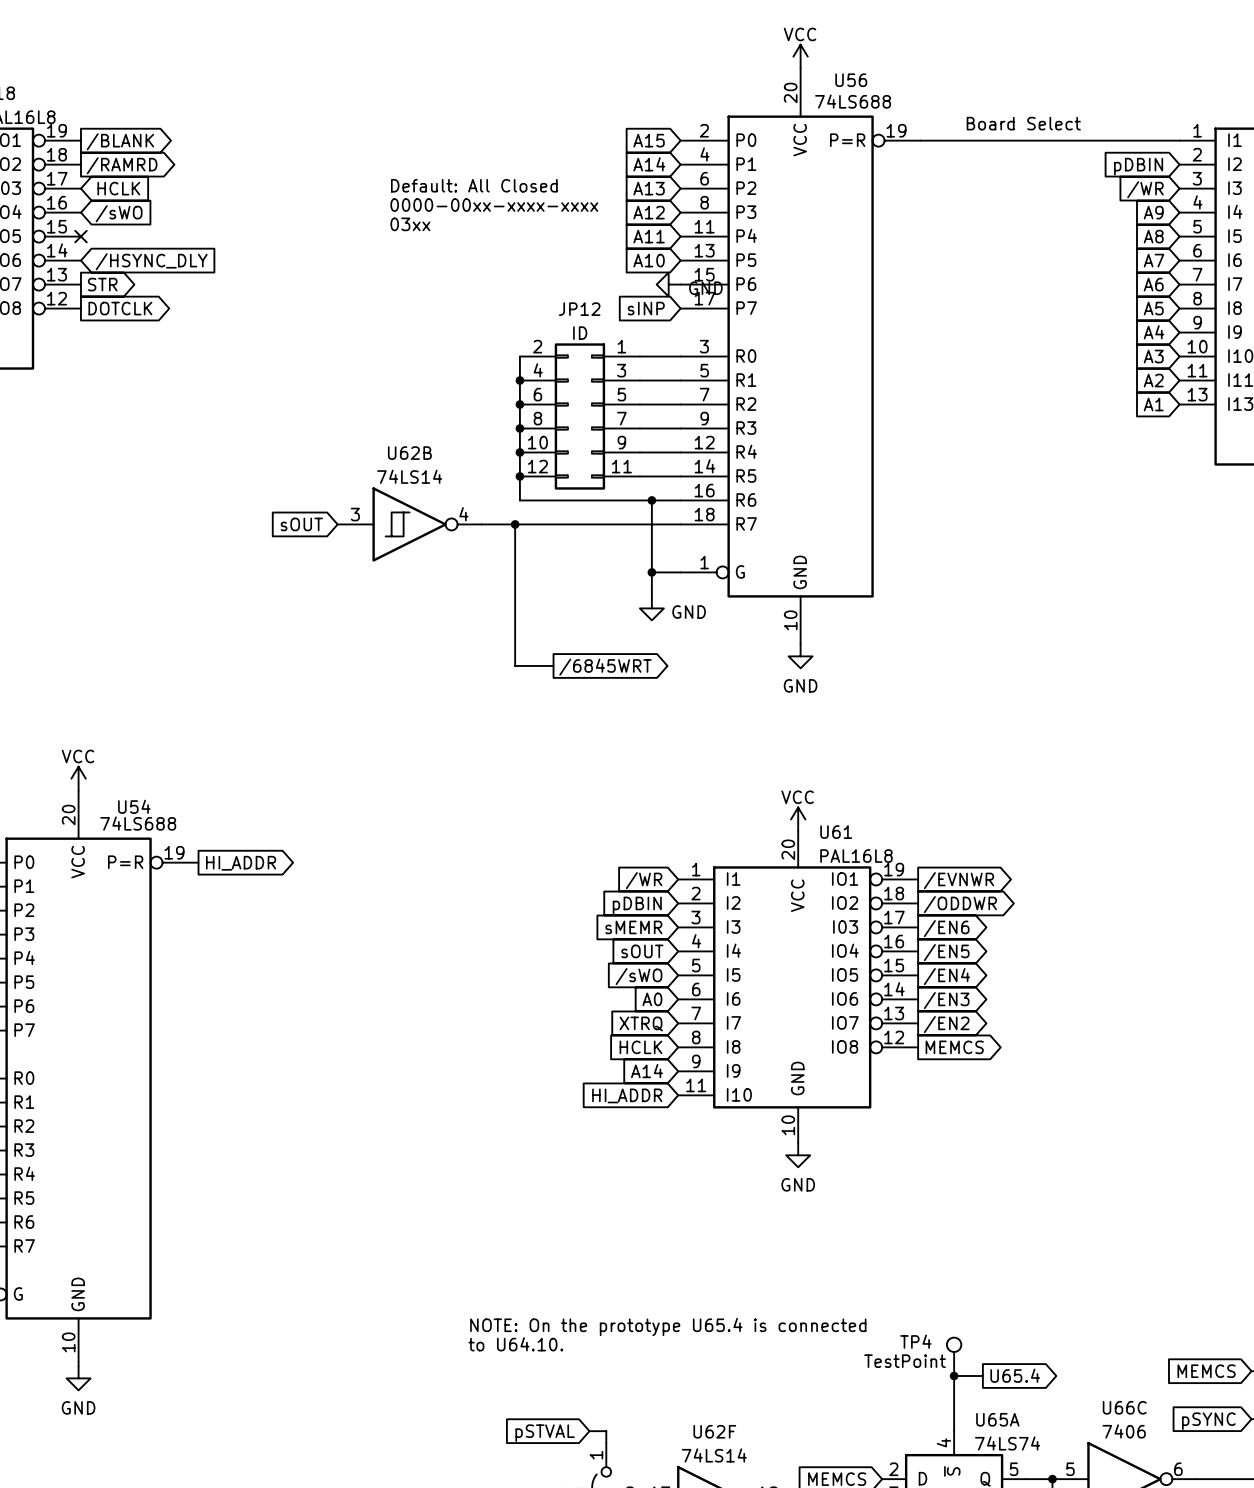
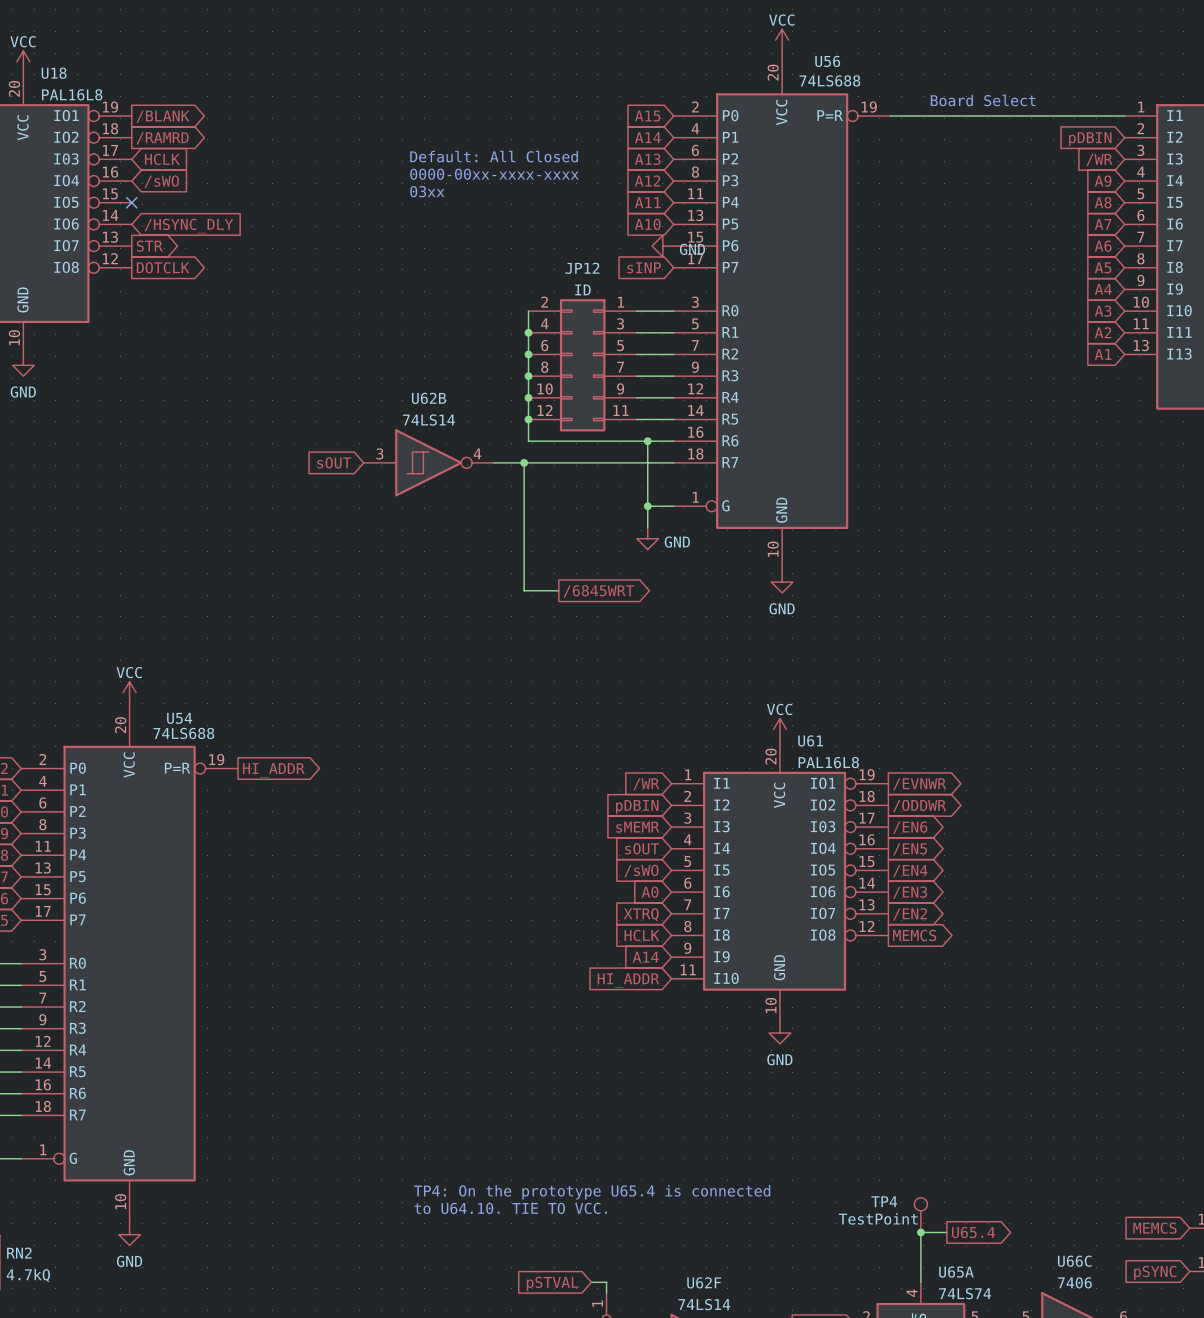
text: NOTE: On the prototype U65.4 is connected (668, 1326) -> TP4: On the prototype U65.4 is connected (592, 1192)
text: to U64.10. (515, 1344) -> to U64.10. TIE TO VCC. (510, 1208)

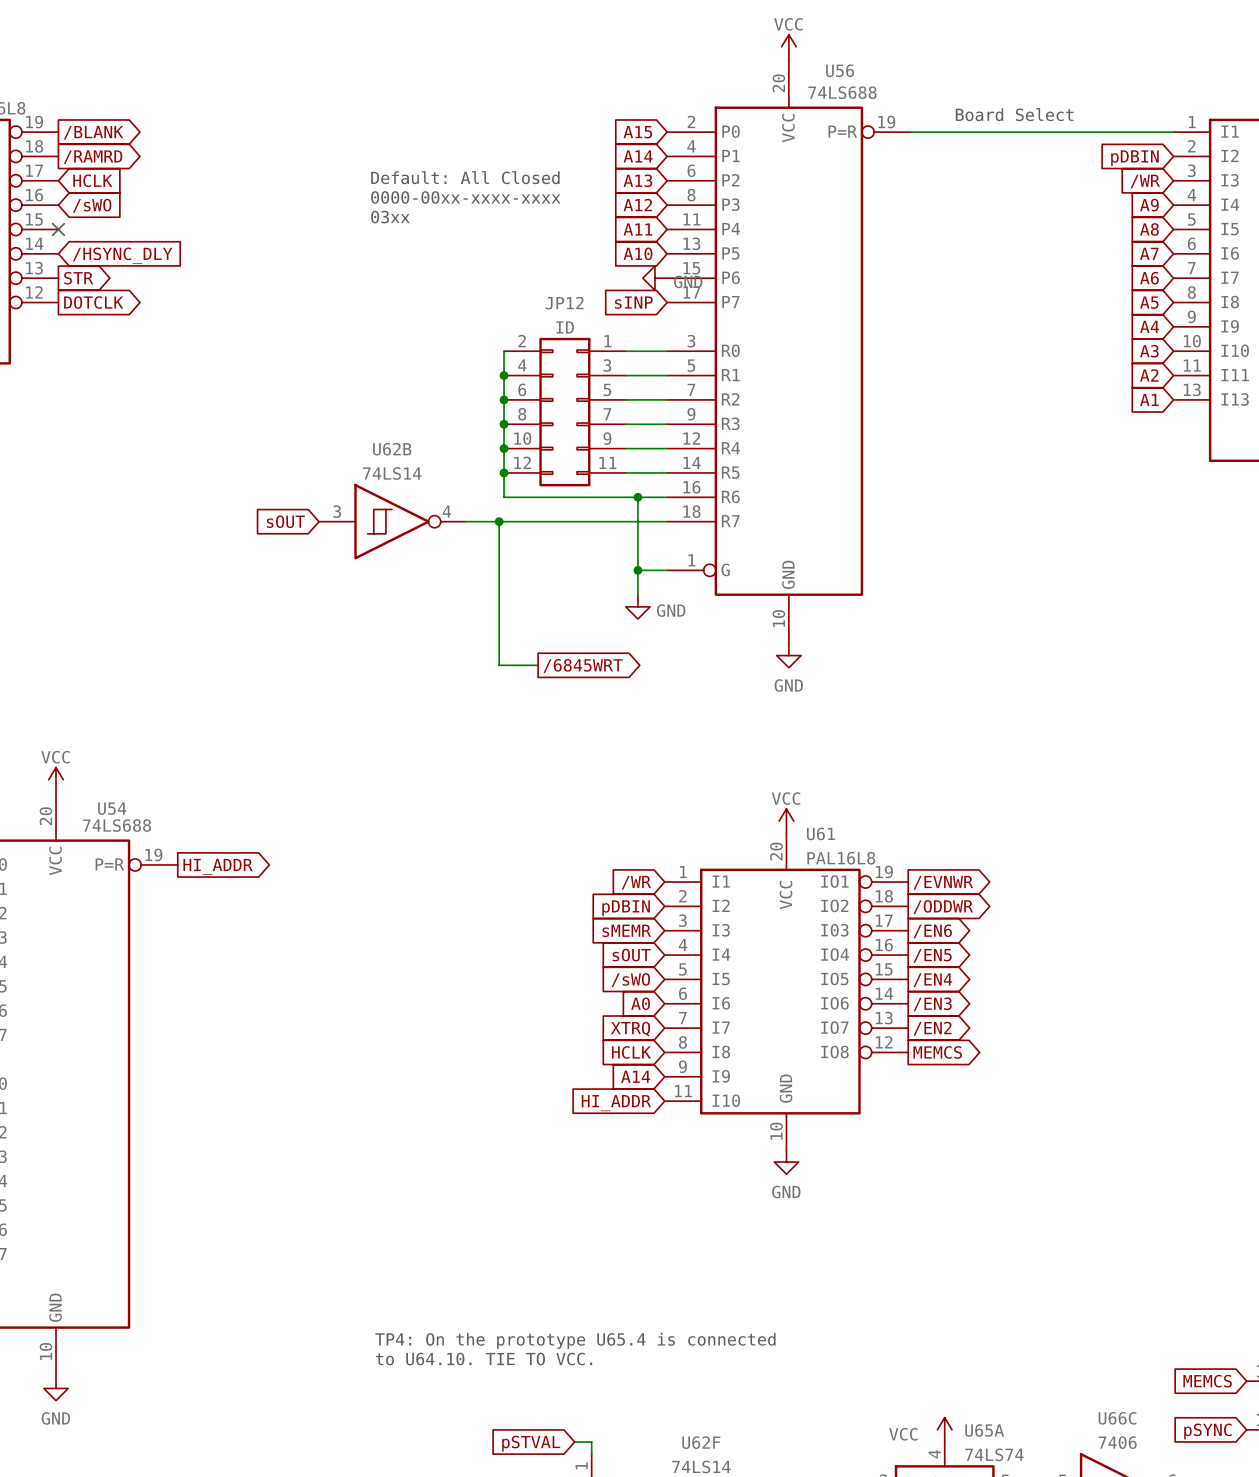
TP4: TestPoint (920, 1215) -> none
junction: (920, 1232) -> none
wire: (946, 1232) (920, 1232) (920, 1282) -> none
global label: U65.4 (973, 1232) -> none
power symbol: none -> VCC (944, 1429)

